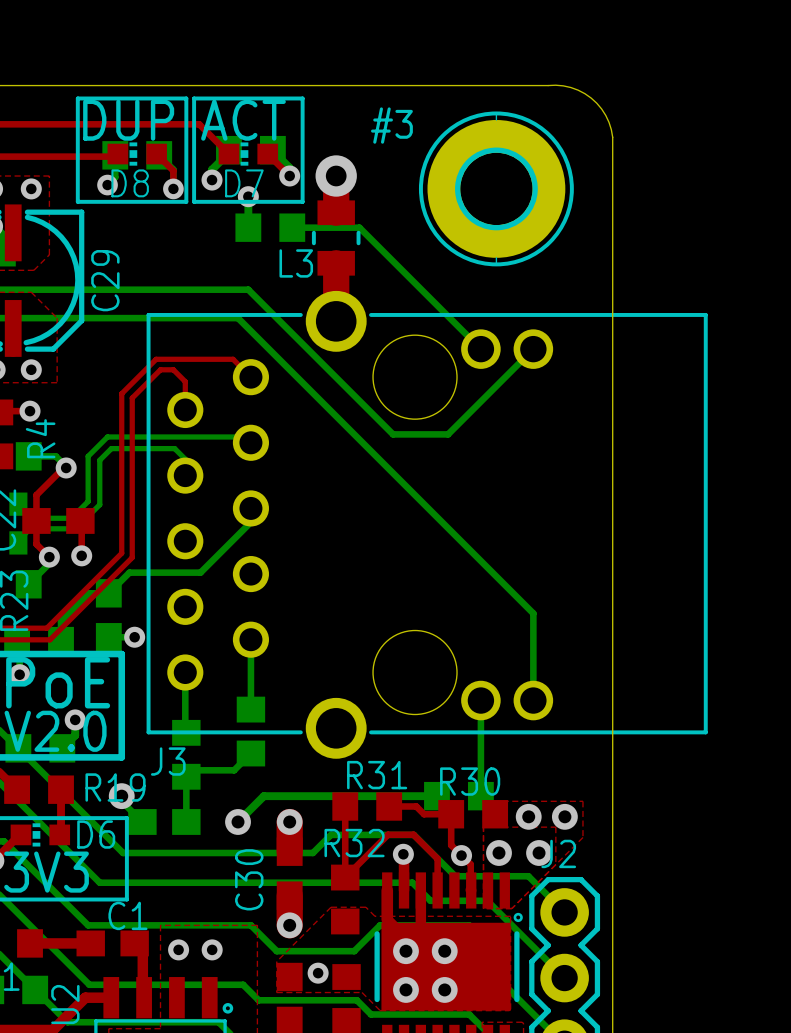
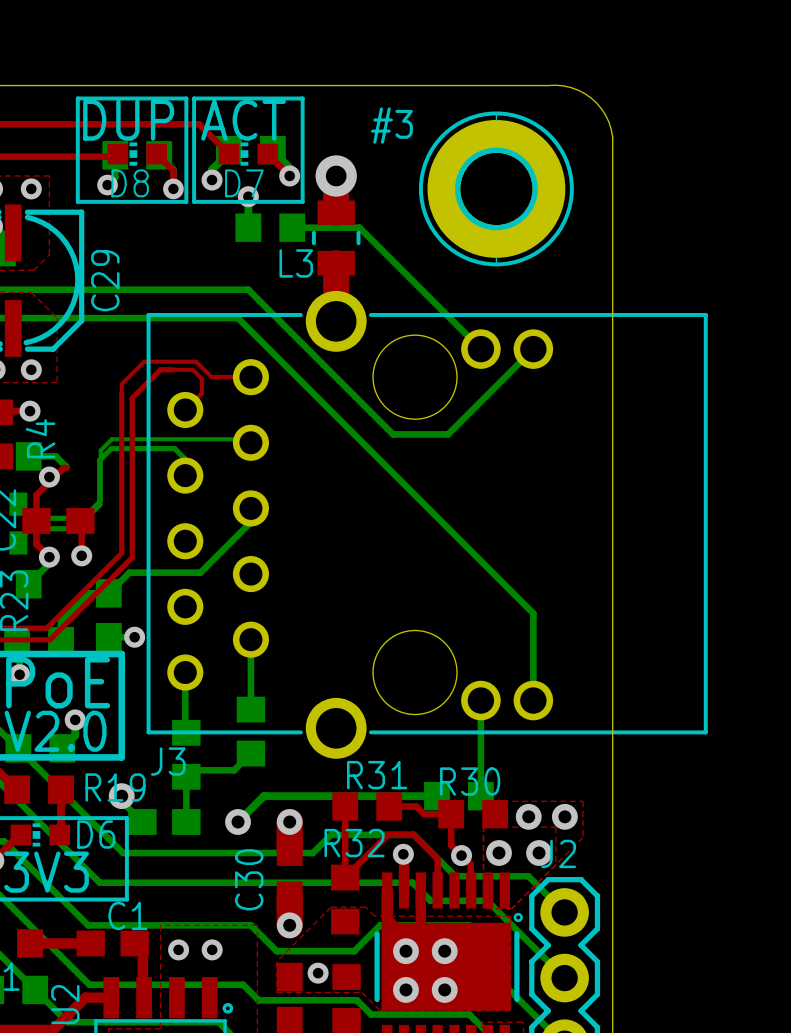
top track: (173, 369) (185, 381) (185, 409) -> (173, 369) (192, 369) (201, 378) (201, 393) (185, 409)
top track: (250, 377) (233, 359) (156, 359) (121, 393) -> (250, 377) (211, 377) (196, 361) (144, 361) (121, 384) (121, 393)
bottom track: (247, 439) (245, 436) (107, 436) (88, 456) (88, 501) (71, 518) -> (247, 439) (111, 439) (100, 450) (100, 500) (82, 518)
via position: (66, 467) -> (49, 477)

